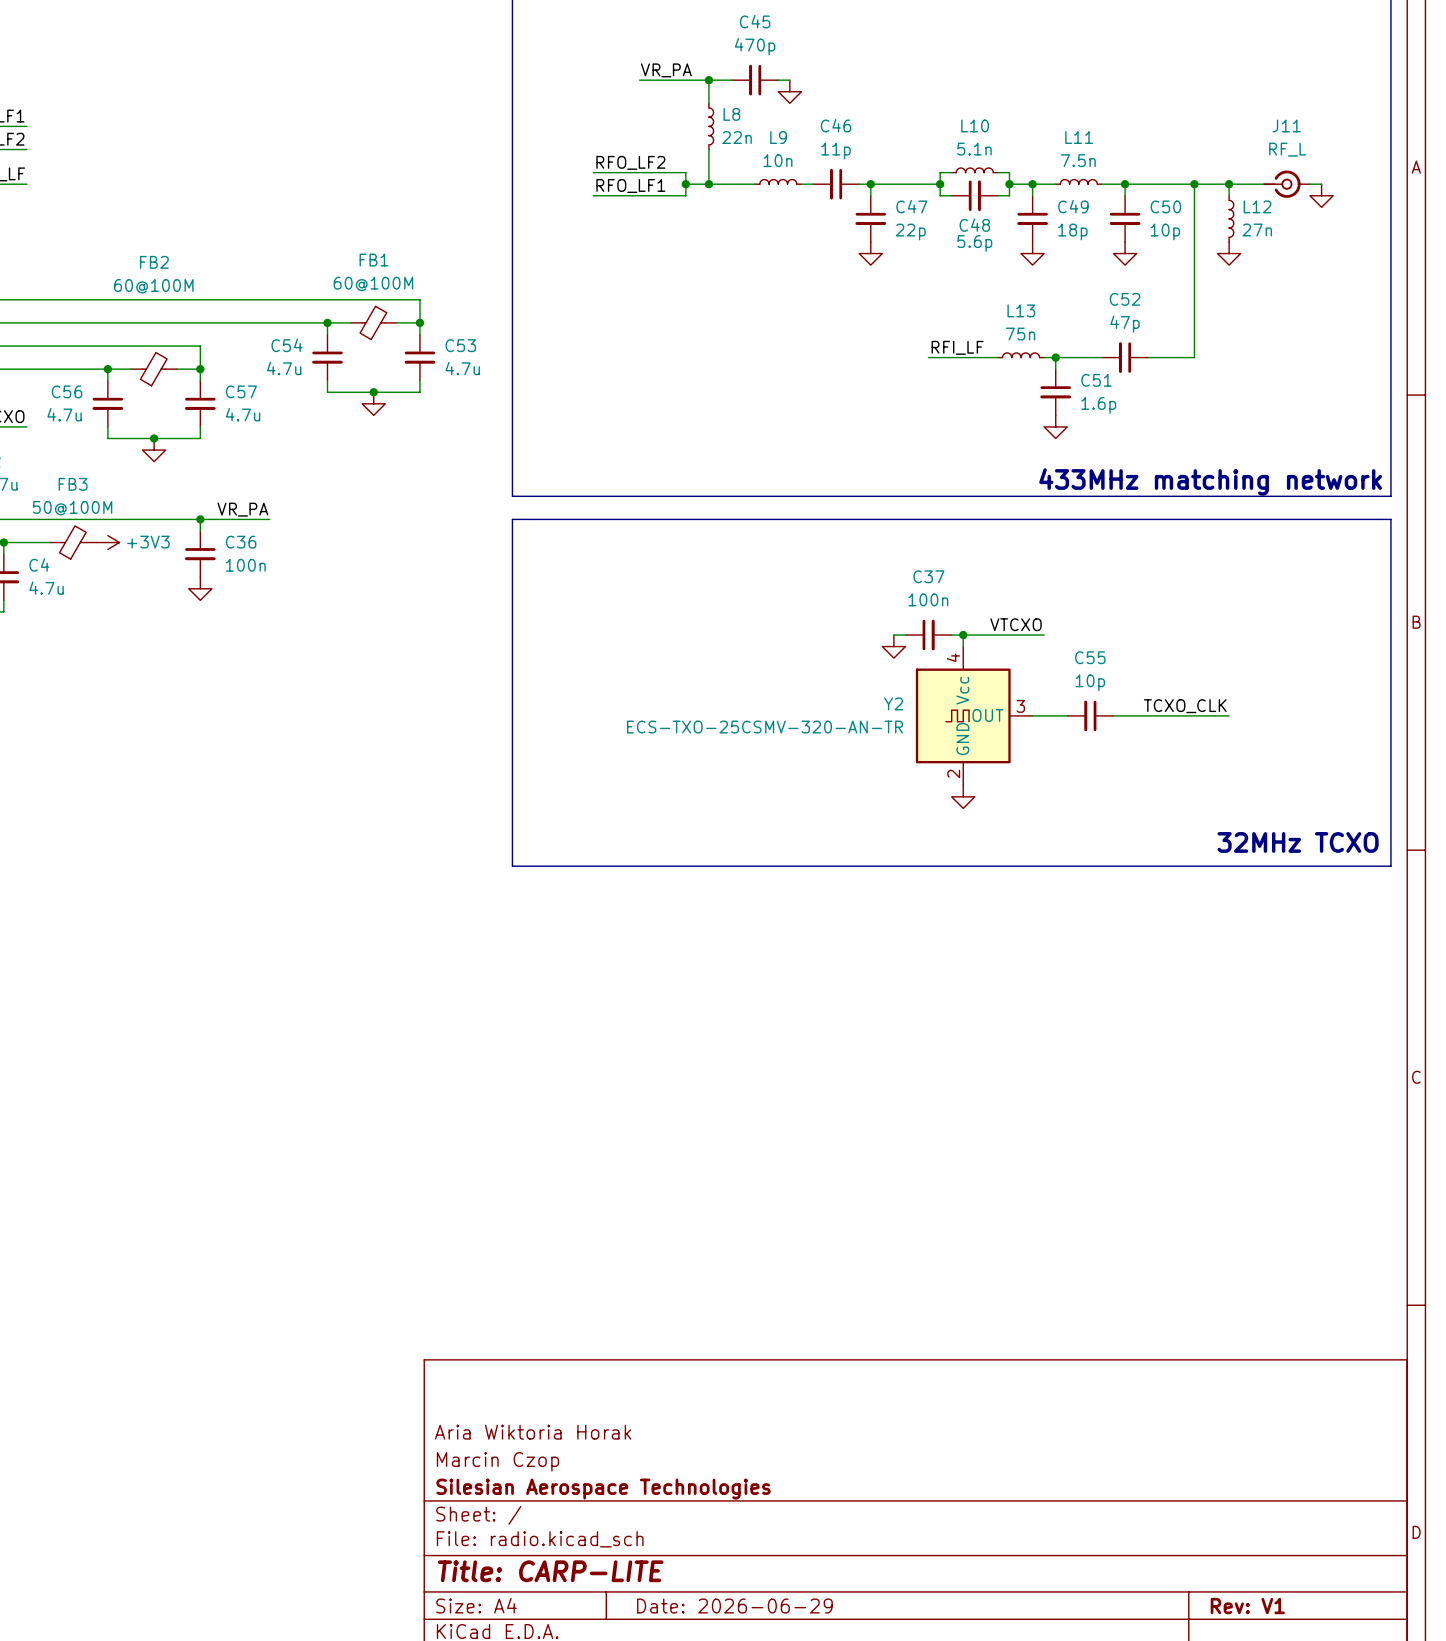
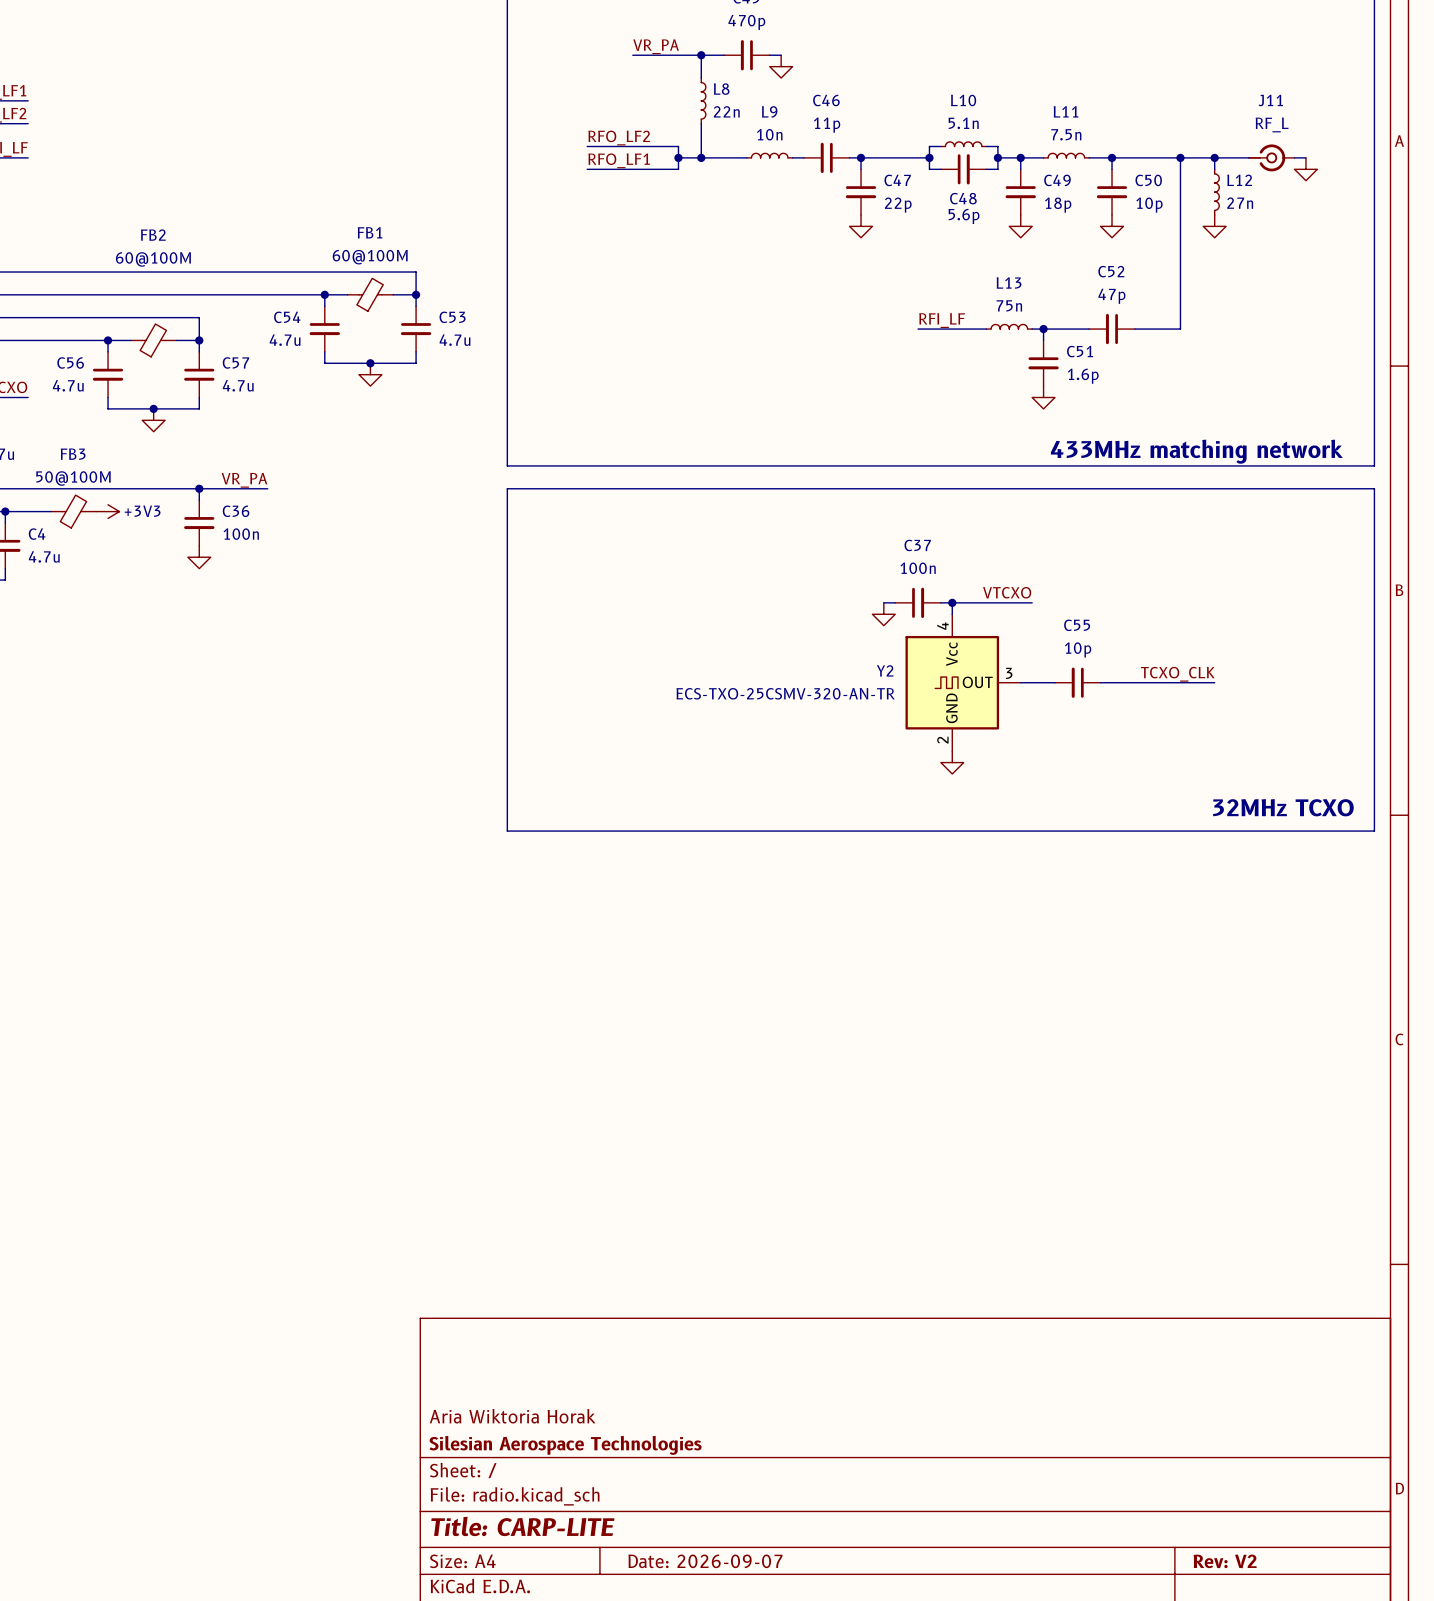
title block: Aria Wiktoria Horak (533, 1432) -> none
title block: Marcin Czop (497, 1461) -> Aria Wiktoria Horak (512, 1416)
title block: Date: 2026-06-29 (734, 1606) -> Date: 2026-09-07 (705, 1561)
title block: Rev: V1 (1247, 1606) -> Rev: V2 (1225, 1561)

